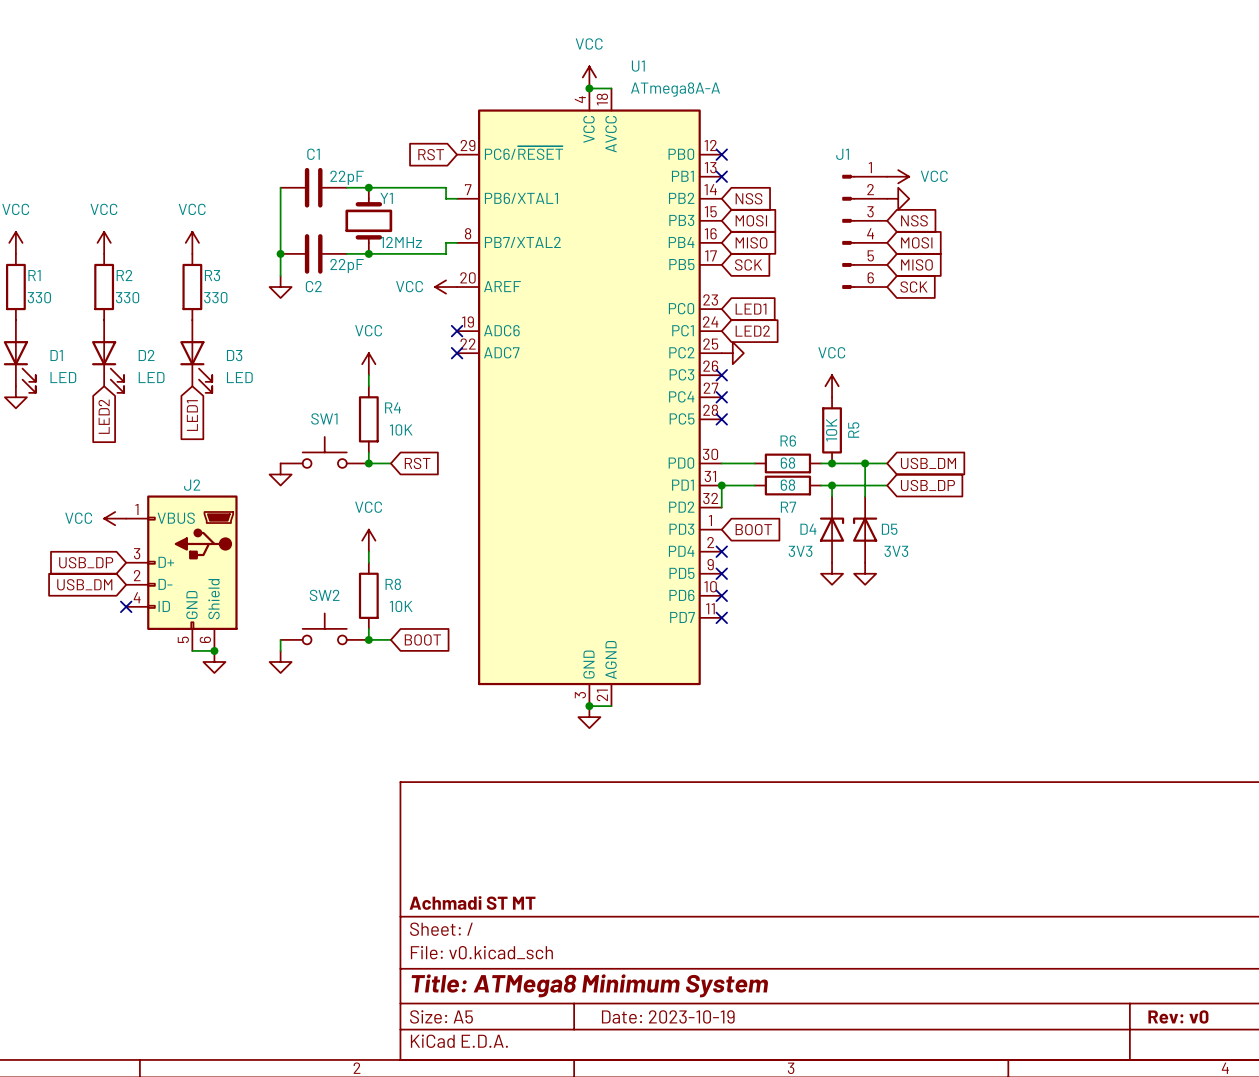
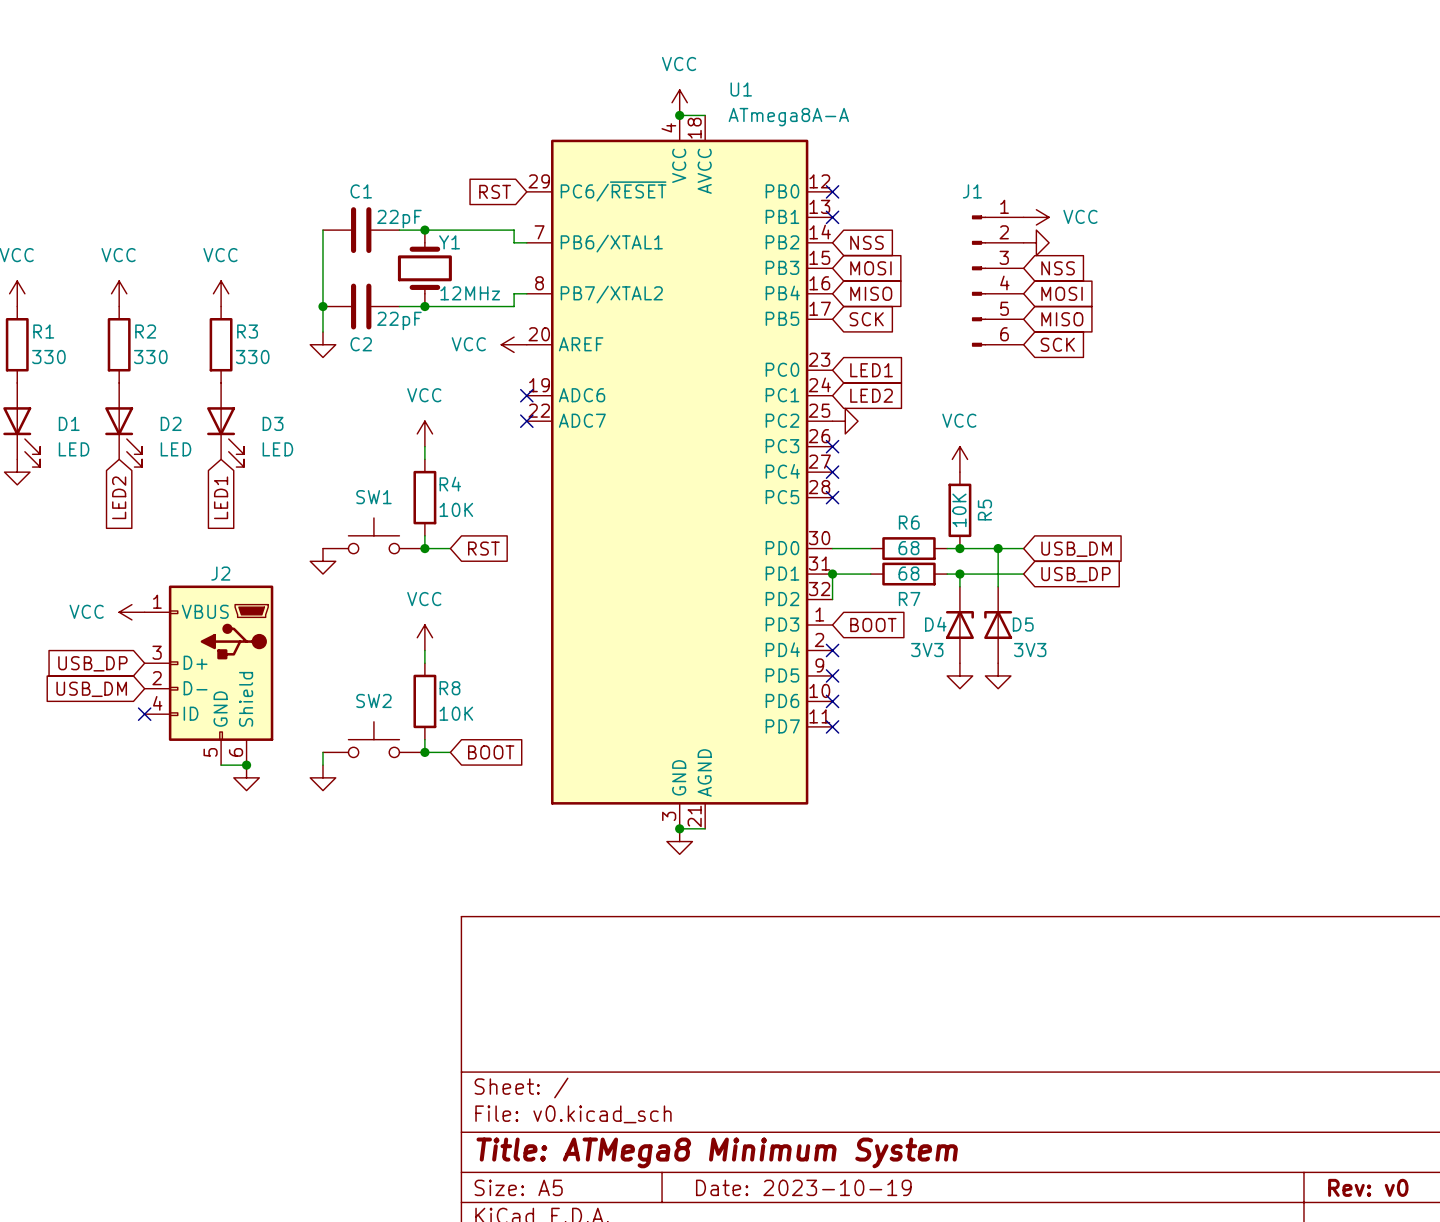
title block: Achmadi ST MT (472, 902) -> none

